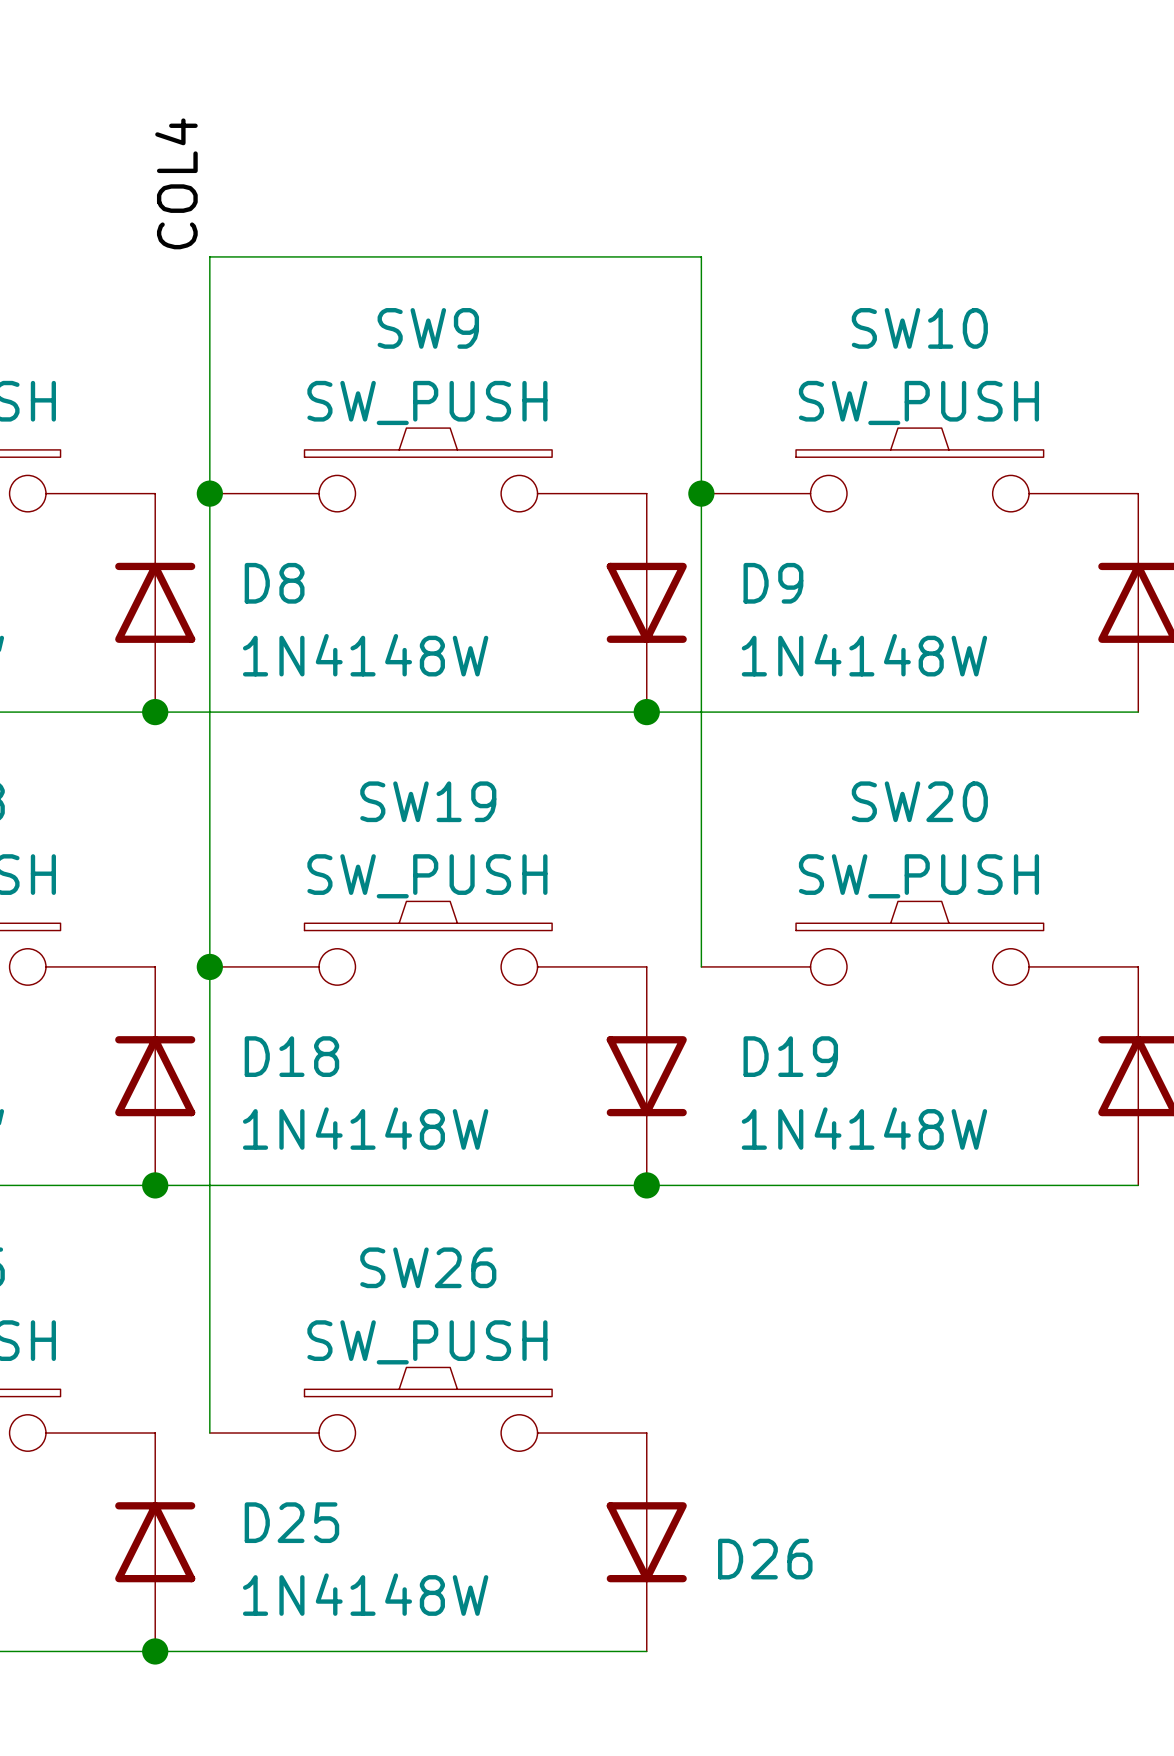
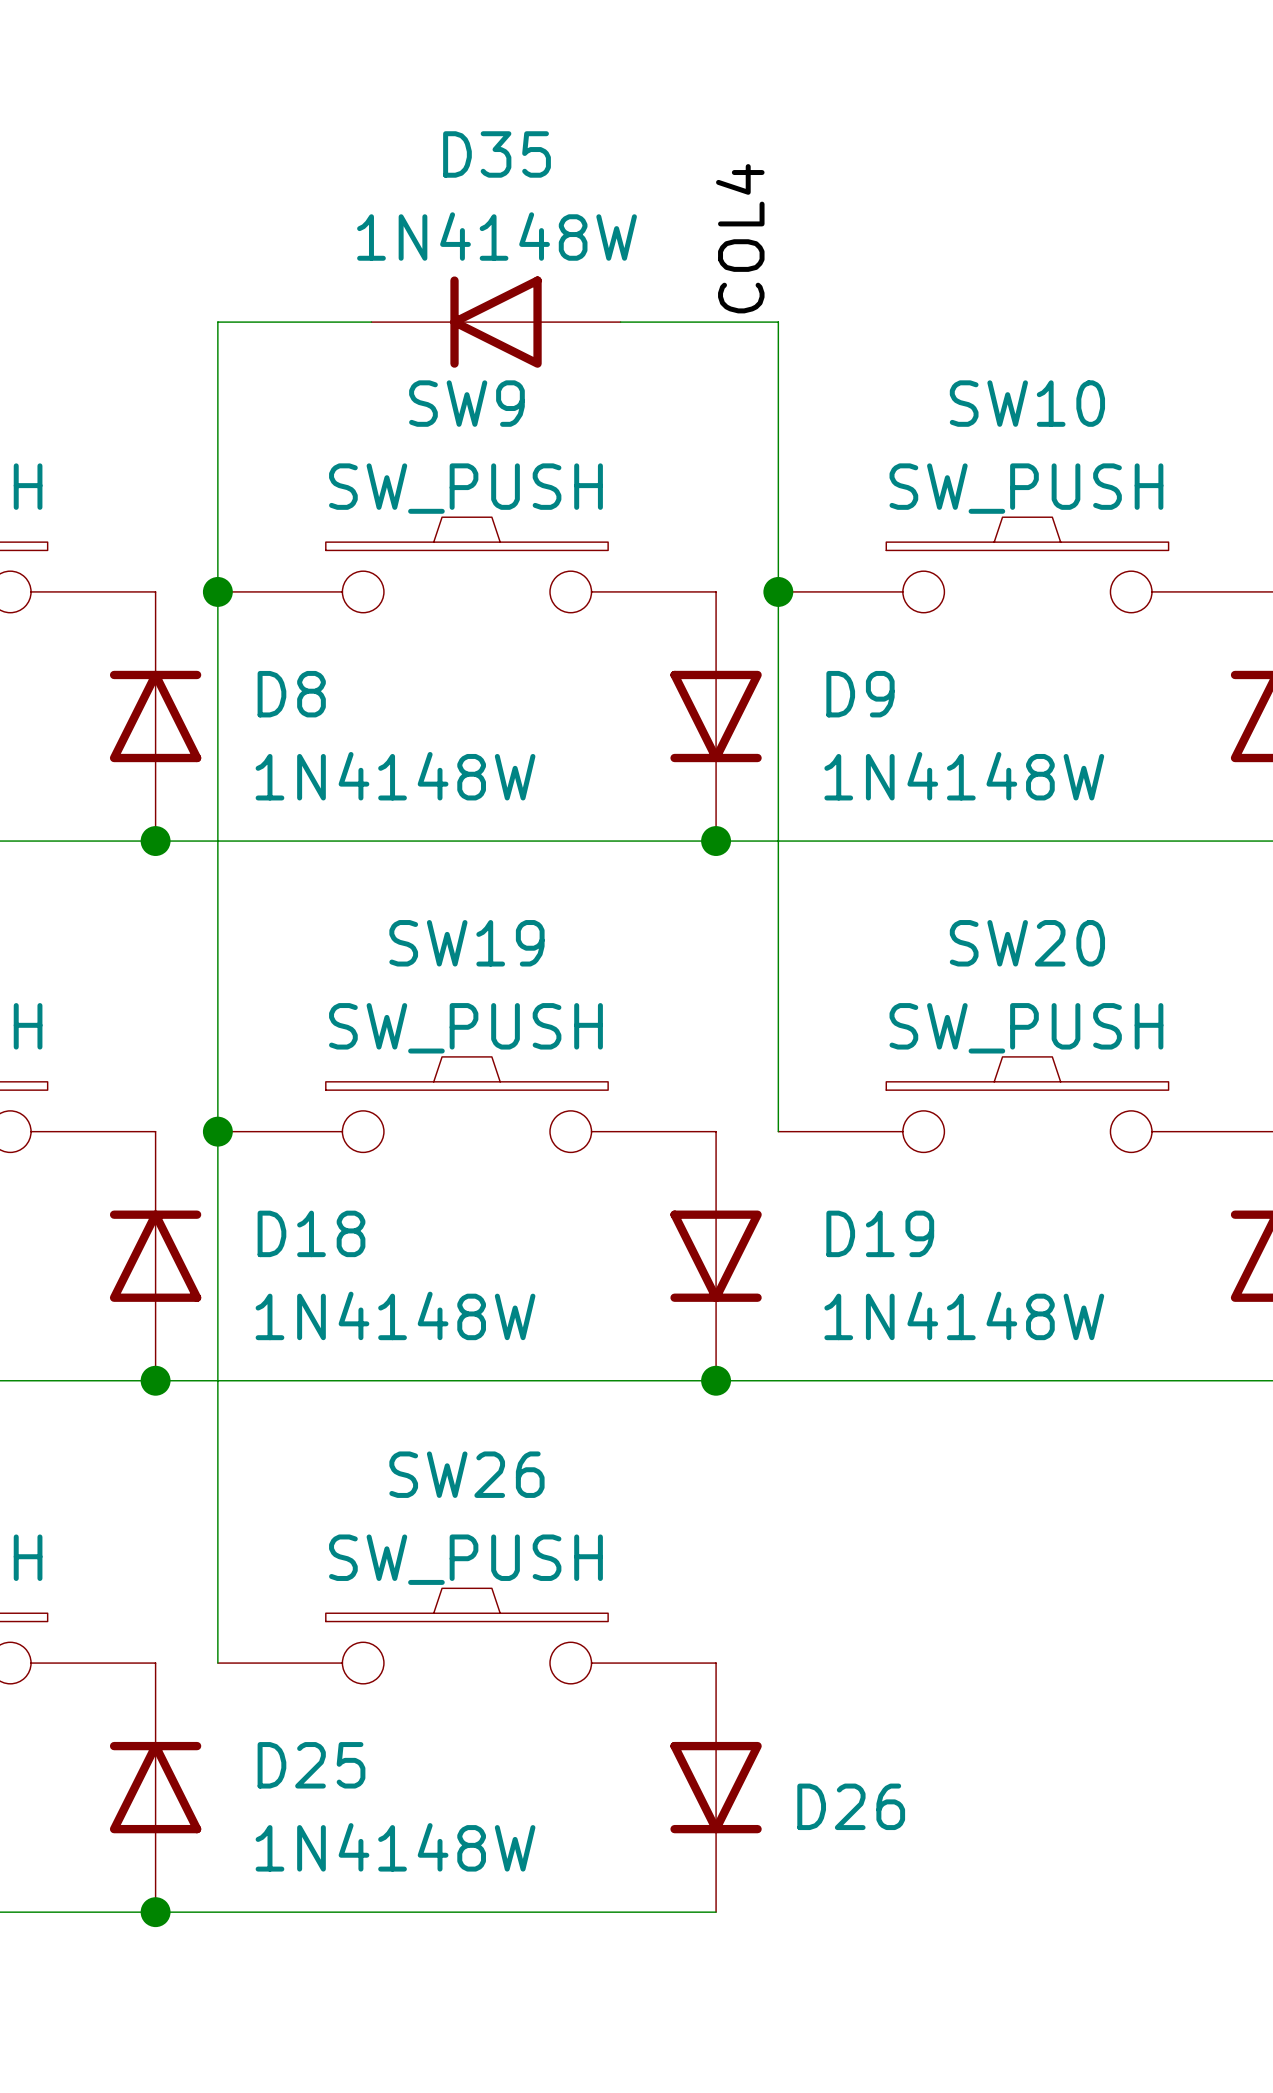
label position: COL4 (176, 183) -> COL4 (740, 238)
D35: none -> 1N4148W (496, 322)

